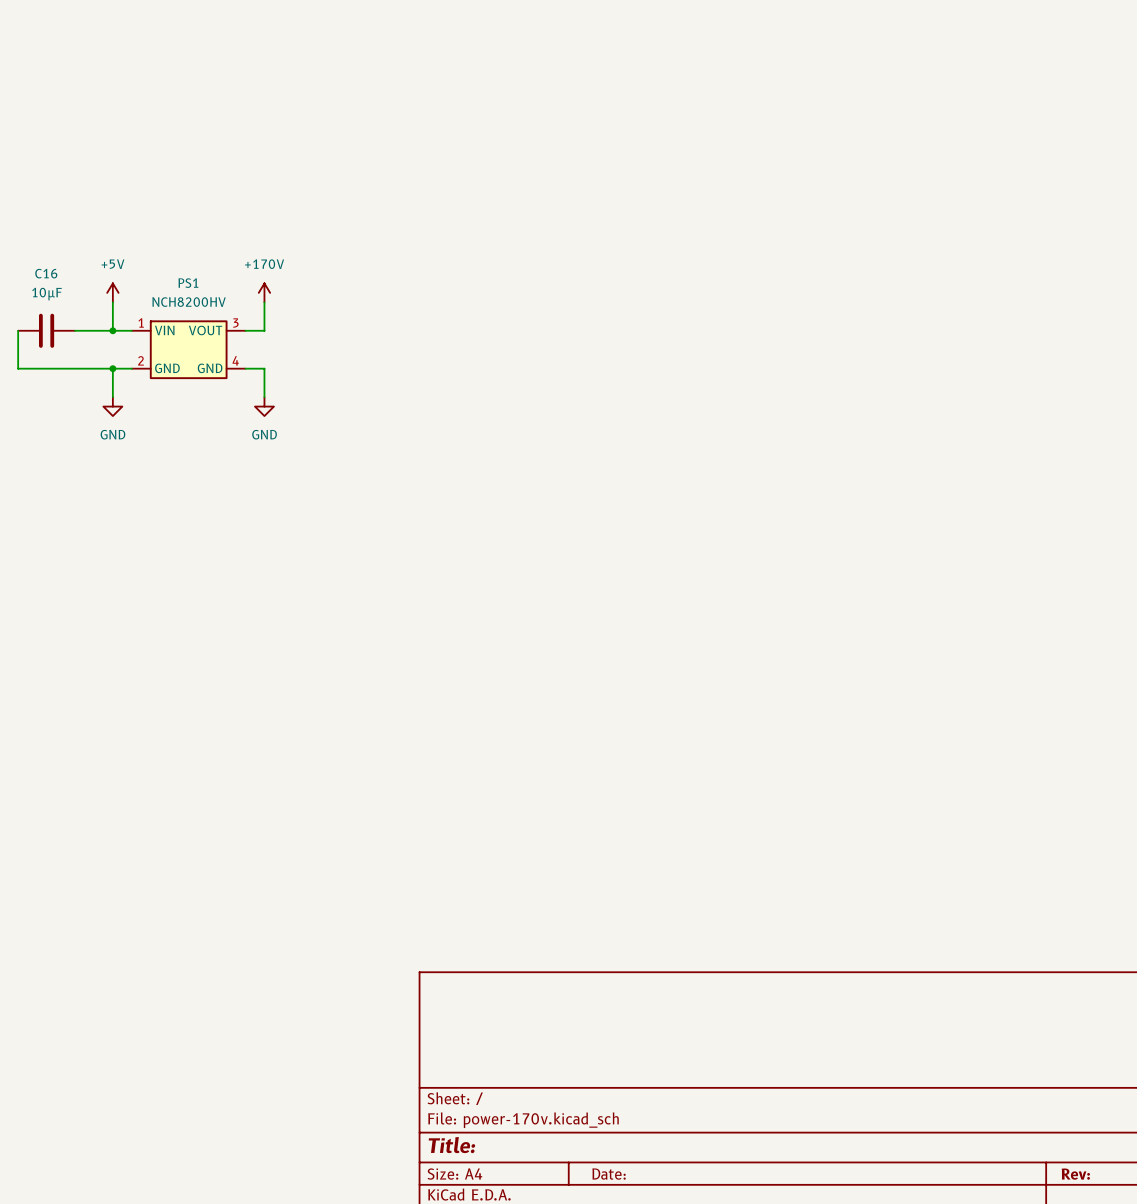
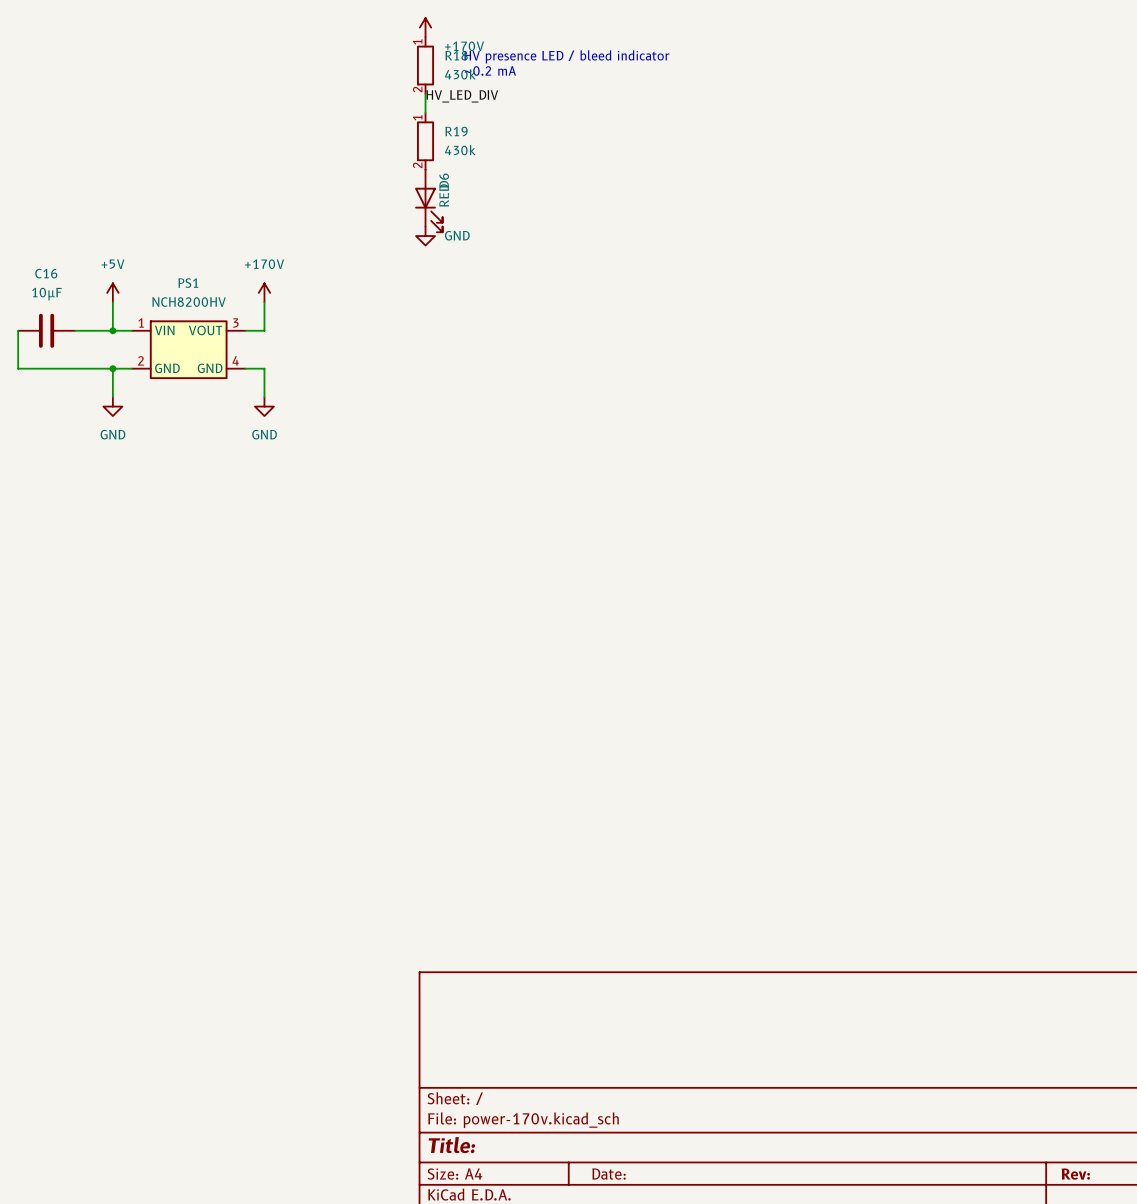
power symbol: none -> +170V (425, 27)
text: none -> HV presence LED / bleed indicator (566, 56)
R18: none -> 430k (425, 65)
text: none -> ~0.2 mA (490, 70)
wire: none -> (425, 93) (425, 112)
label: none -> HV_LED_DIV (462, 96)
R19: none -> 430k (425, 141)
D6: none -> RED (428, 200)
power symbol: none -> GND (425, 236)

